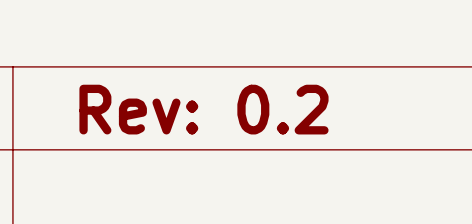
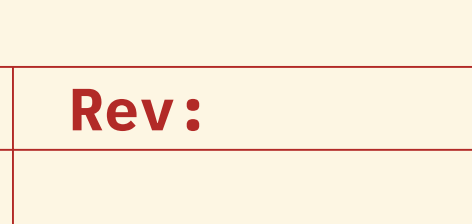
title block: Rev: 0.2 (203, 109) -> Rev: (135, 109)

